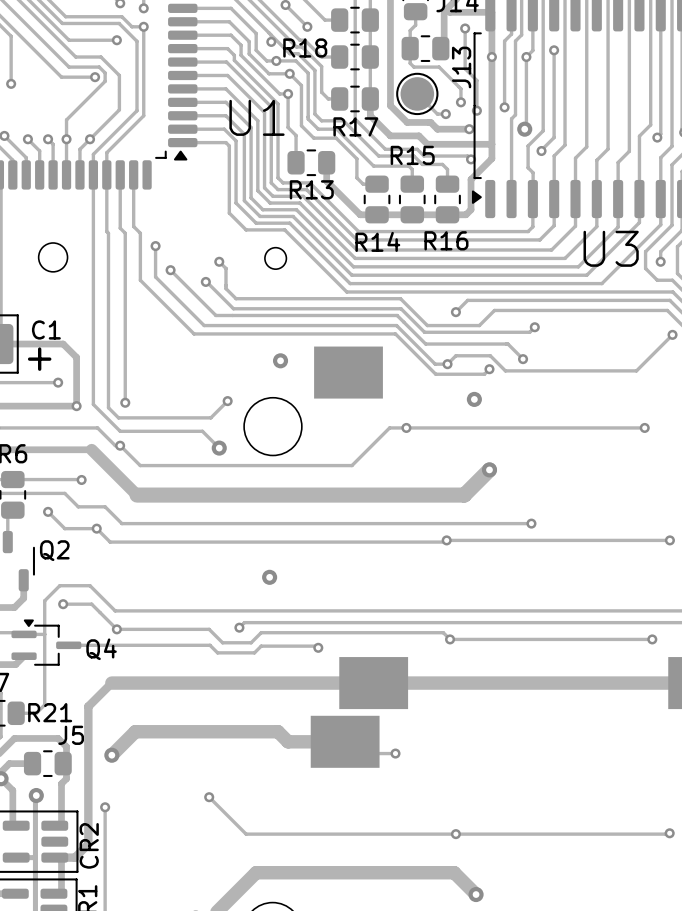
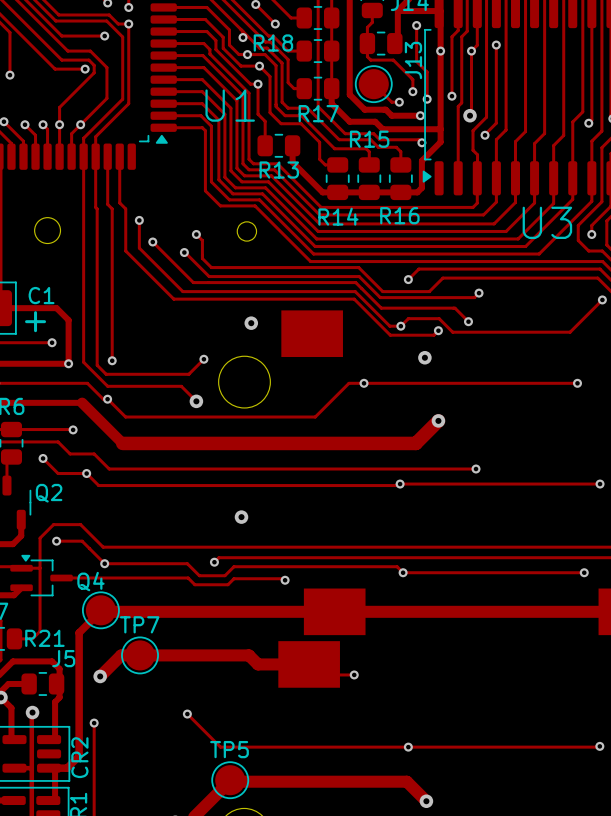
part: none -> (100, 610)
TP7: none -> (140, 655)
TP5: none -> (230, 780)

